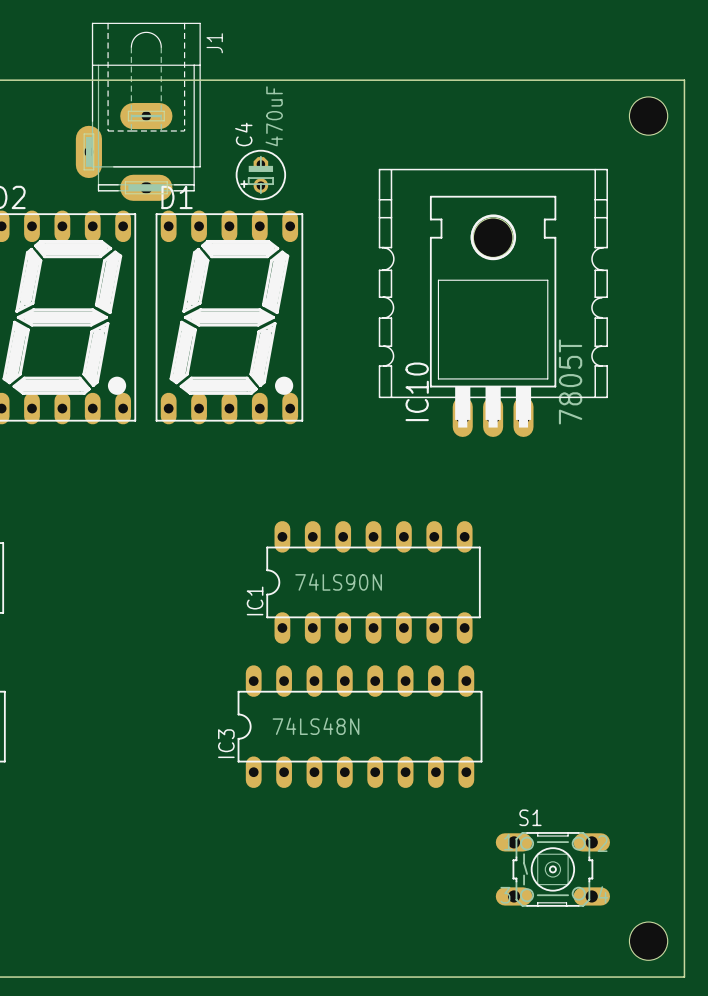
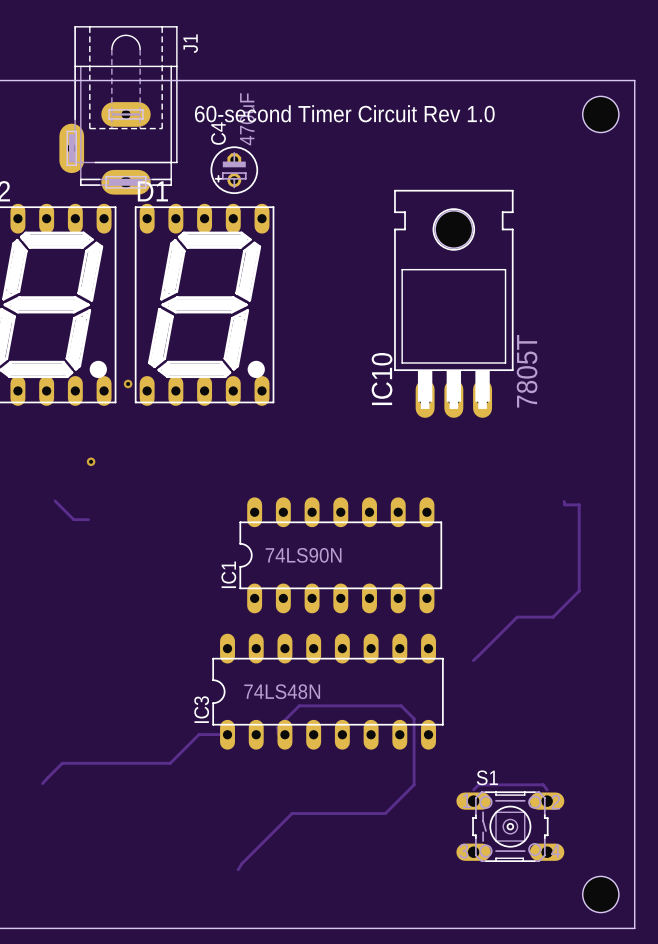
text: none -> 60-second Timer Circuit Rev 1.0 (344, 113)
drawing: [378, 168, 609, 399] -> none
via: none -> (128, 383)
via: none -> (91, 461)
track: none -> (55, 500) (73, 519) (88, 519)
track: none -> (564, 501) (564, 504) (579, 504) (579, 591) (553, 617) (517, 617) (473, 660)
track: none -> (220, 734) (199, 734) (170, 763) (62, 763) (42, 783)
track: none -> (278, 734) (277, 727) (299, 705) (401, 705) (414, 718) (414, 784) (385, 813) (292, 813) (238, 869)
track: none -> (473, 789) (478, 784) (543, 784) (547, 789)

